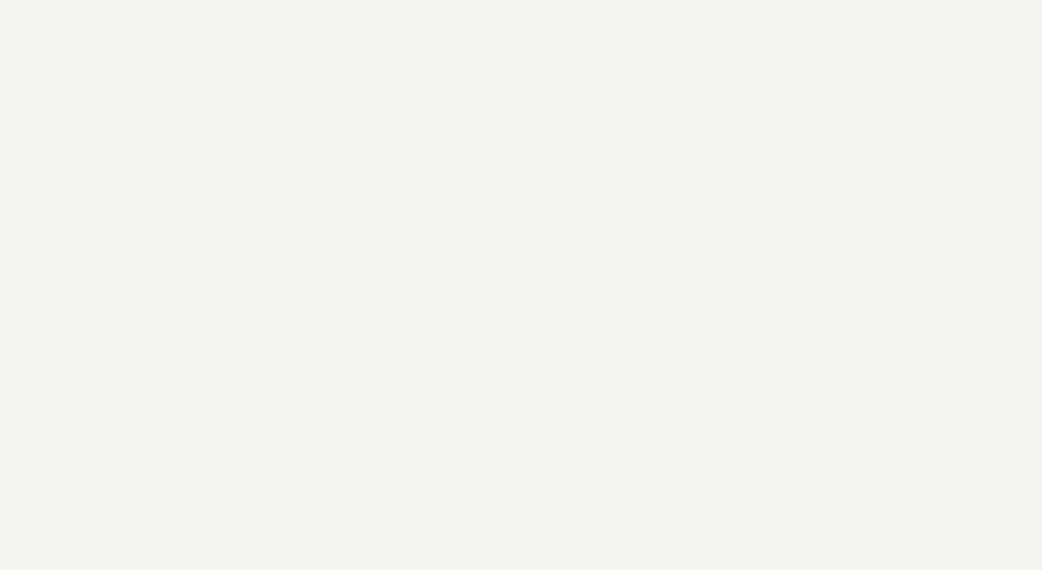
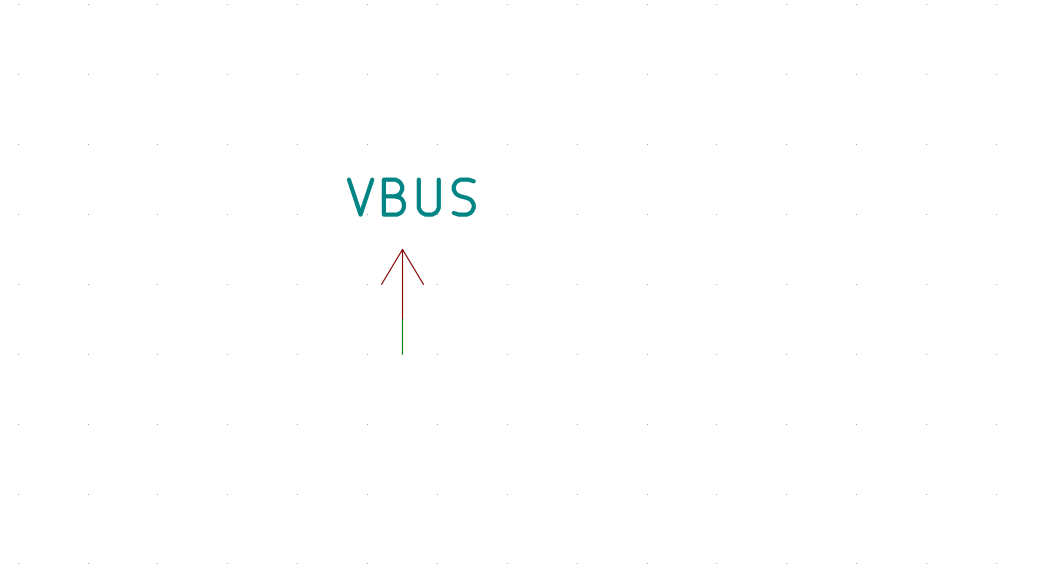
power symbol: none -> VBUS (402, 284)
wire: none -> (402, 319) (402, 354)

